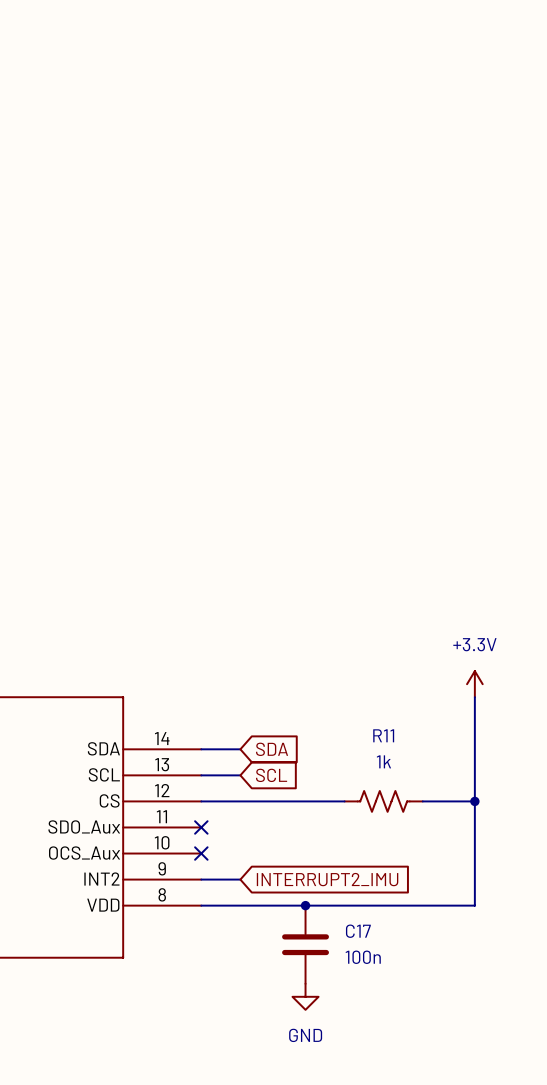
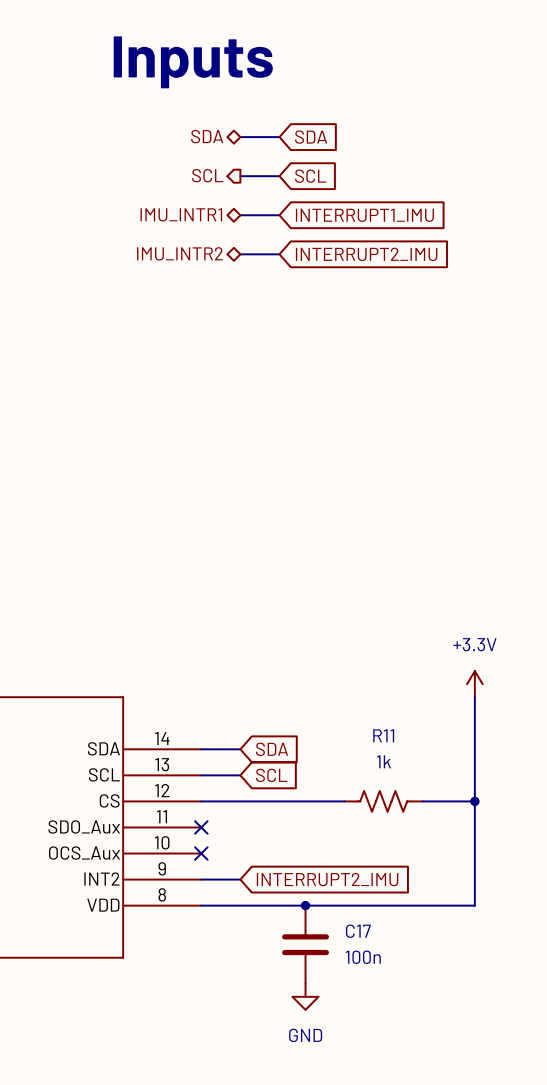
text: none -> Inputs (193, 62)
hierarchical label: none -> SDA (207, 136)
wire: none -> (240, 137) (279, 137)
global label: none -> SDA (311, 137)
hierarchical label: none -> SCL (207, 175)
wire: none -> (240, 176) (279, 176)
global label: none -> SCL (310, 176)
hierarchical label: none -> IMU_INTR1 (181, 214)
wire: none -> (240, 215) (279, 215)
global label: none -> INTERRUPT1_IMU (364, 215)
hierarchical label: none -> IMU_INTR2 (179, 253)
wire: none -> (240, 254) (279, 254)
global label: none -> INTERRUPT2_IMU (366, 254)

